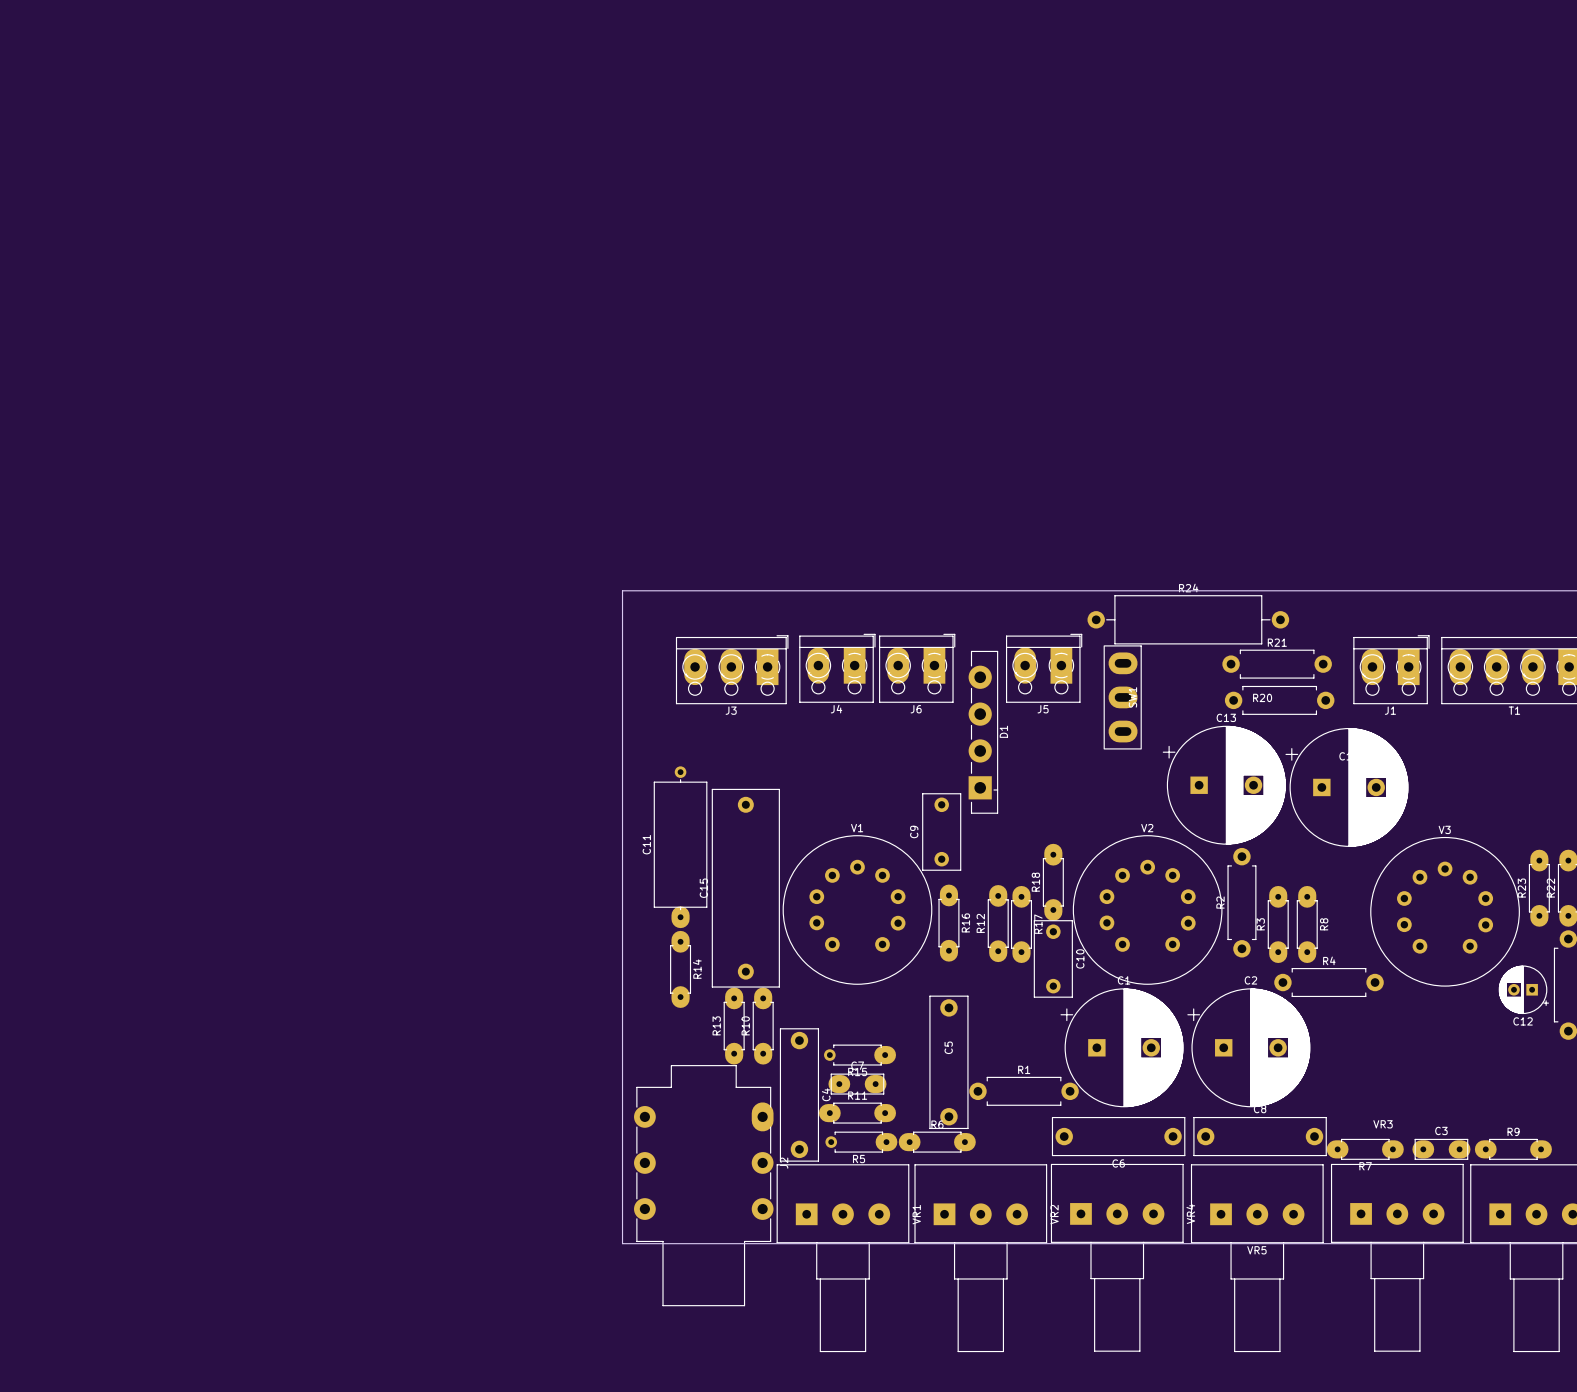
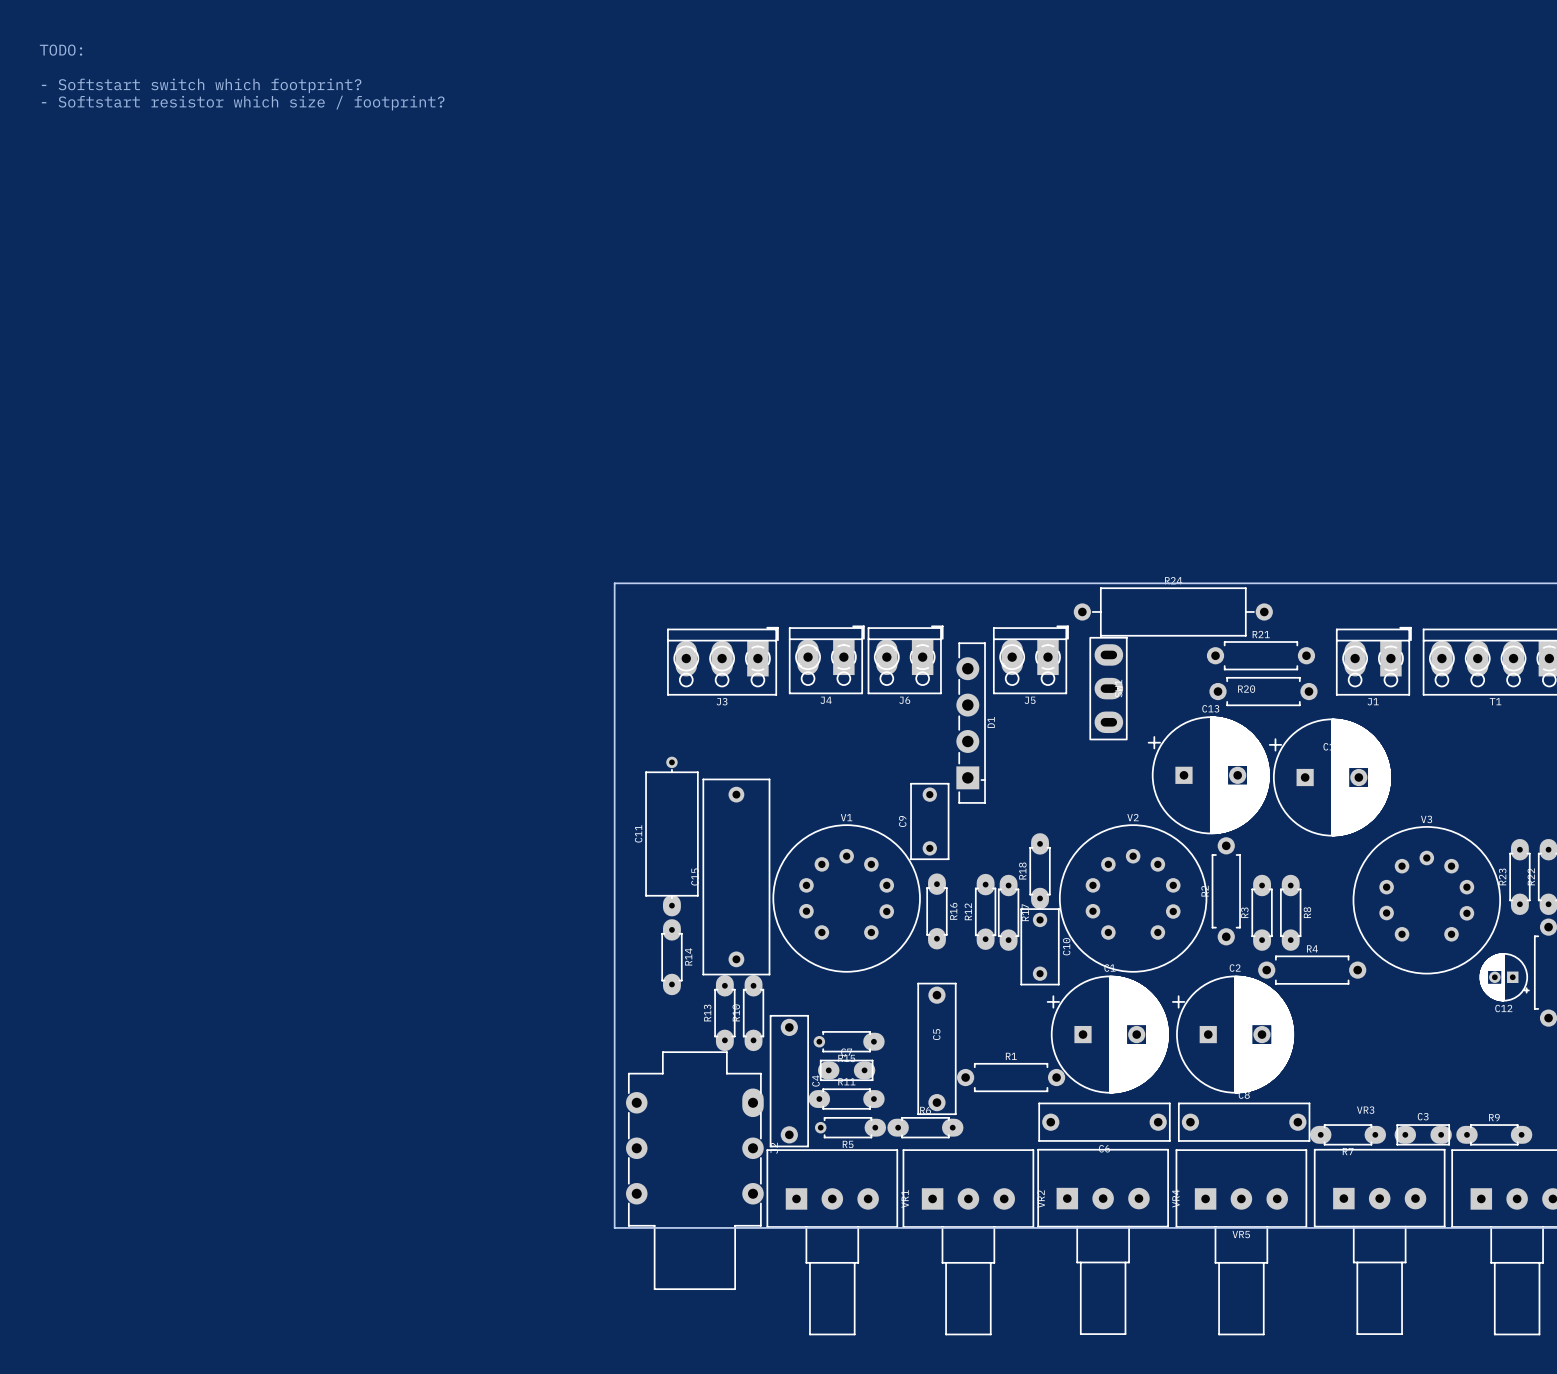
text: none -> TODO: (61, 50)
text: none -> - Softstart switch which footprint? (201, 85)
text: none -> - Softstart resistor which size / footprint? (243, 103)

